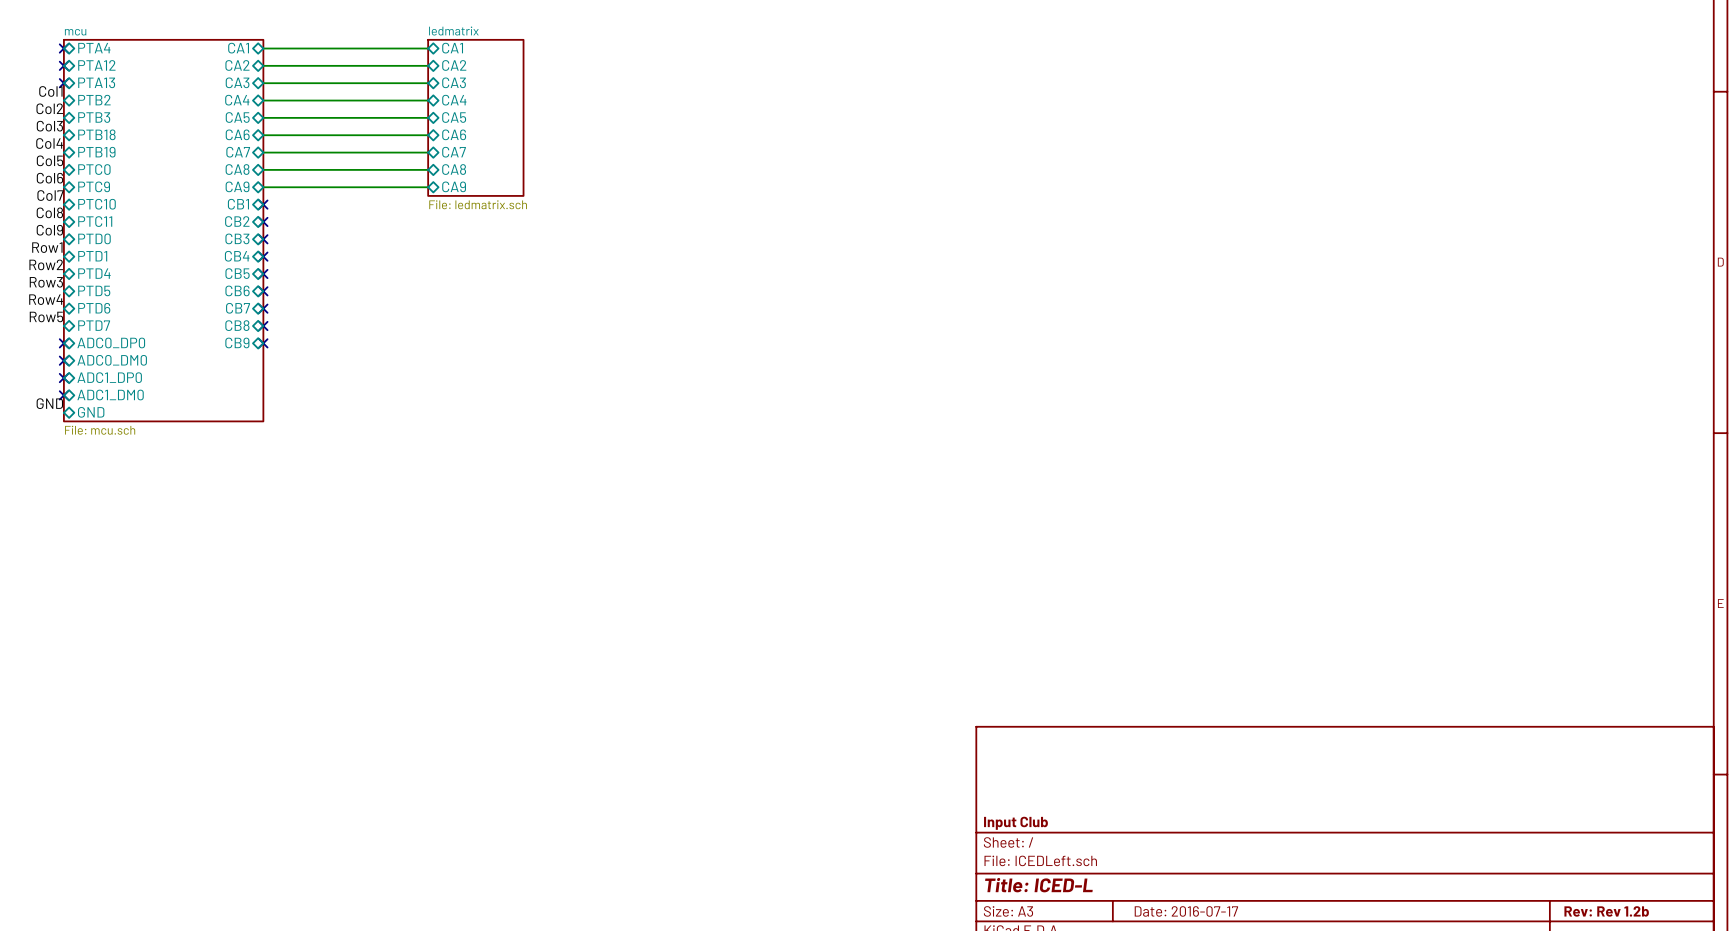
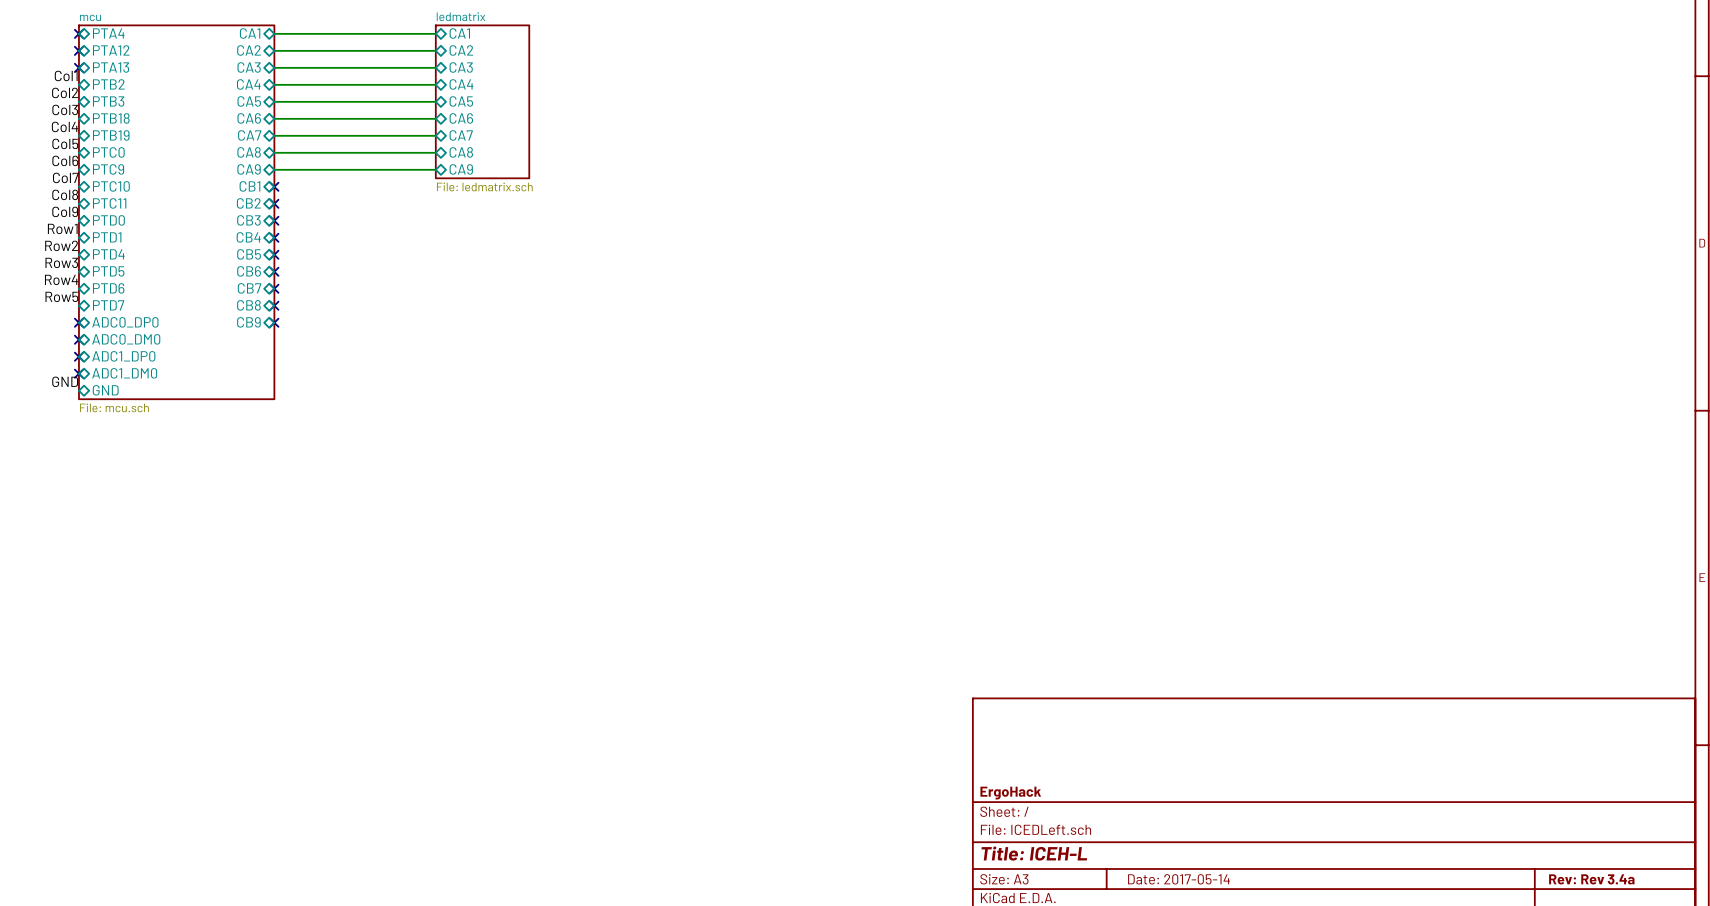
title block: Input Club (1015, 823) -> ErgoHack (1010, 793)
title block: Title: ICED-L (1038, 885) -> Title: ICEH-L (1034, 853)
title block: Date: 2016-07-17 (1186, 911) -> Date: 2017-05-14 (1178, 879)
title block: Rev: Rev 1.2b (1606, 911) -> Rev: Rev 3.4a (1591, 879)

